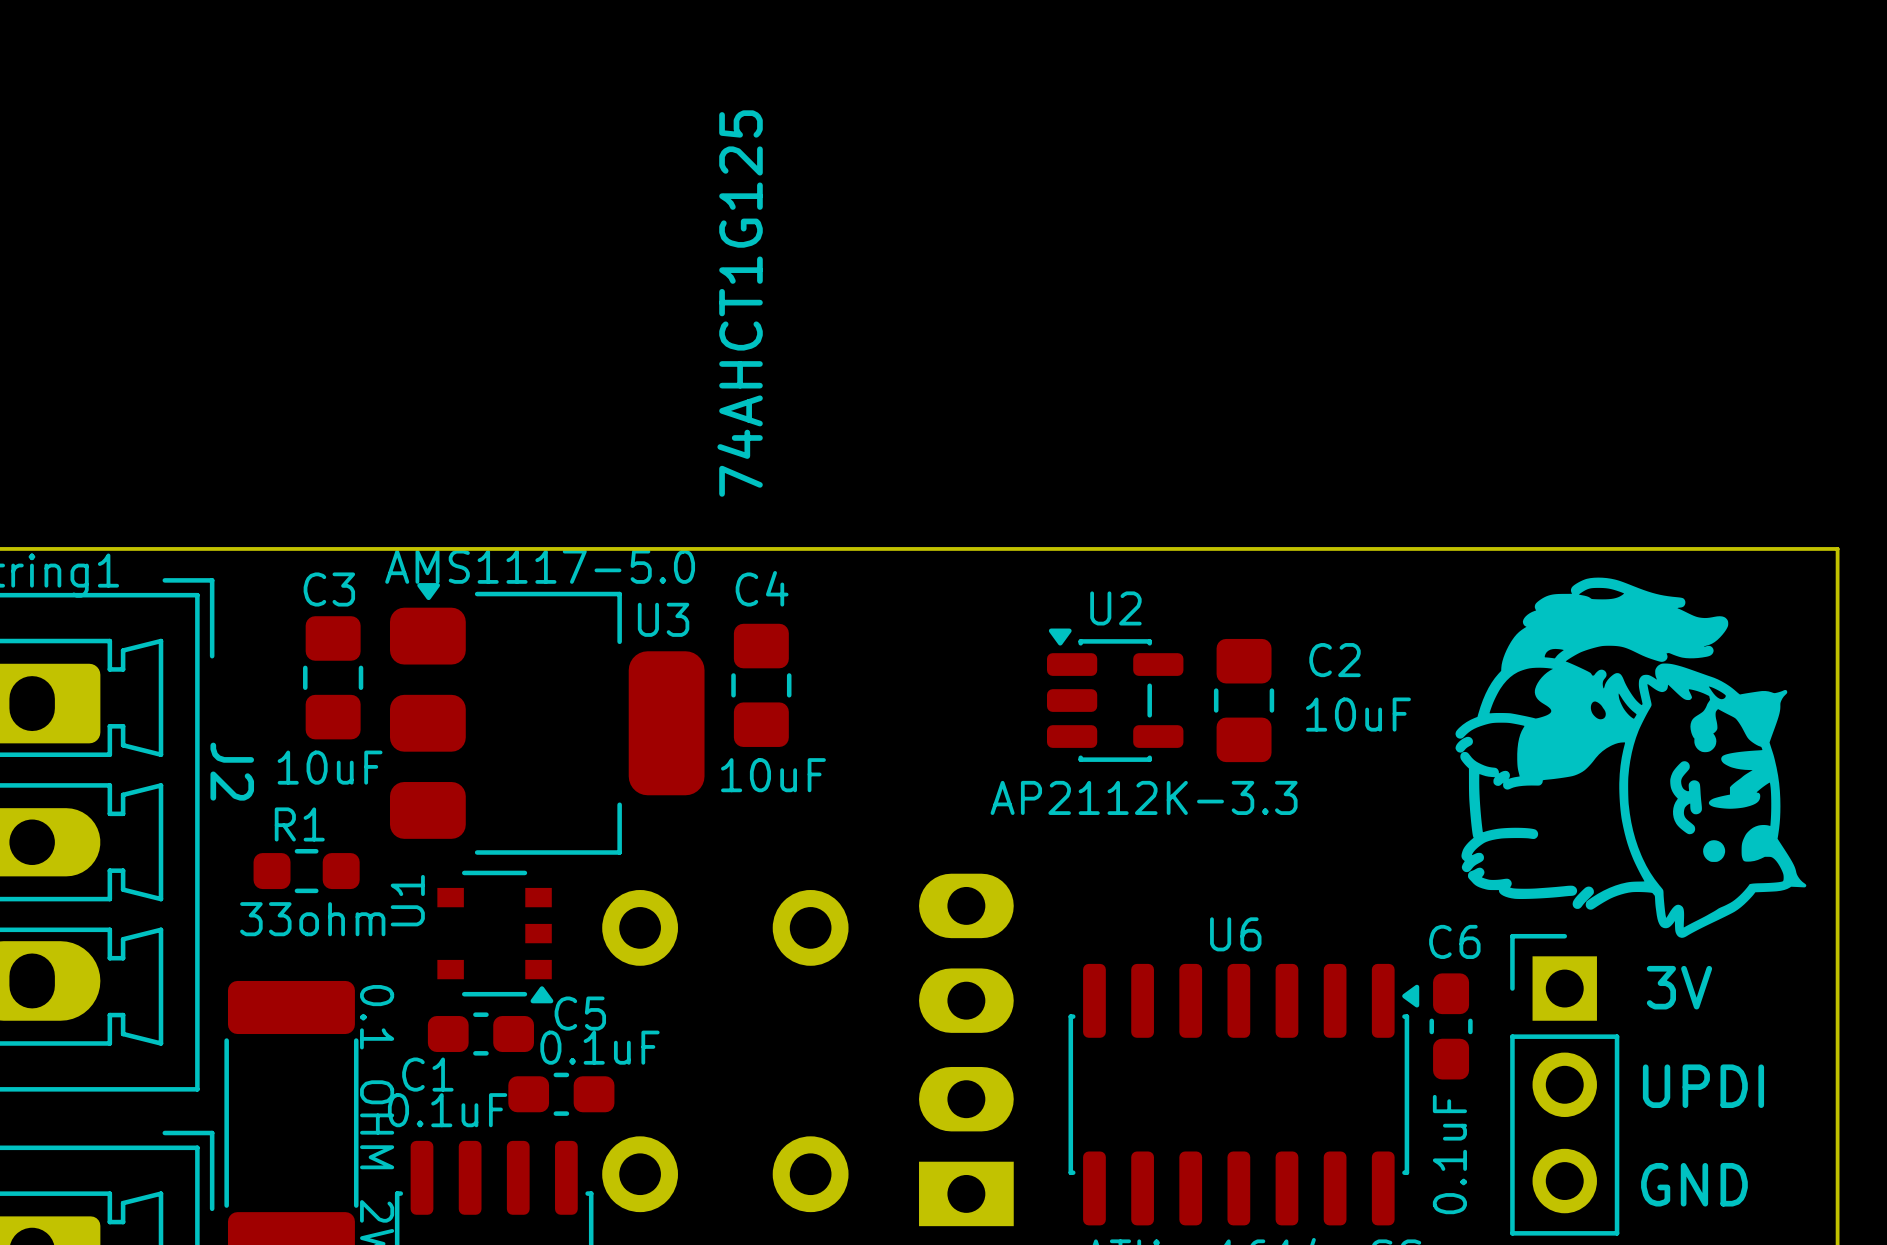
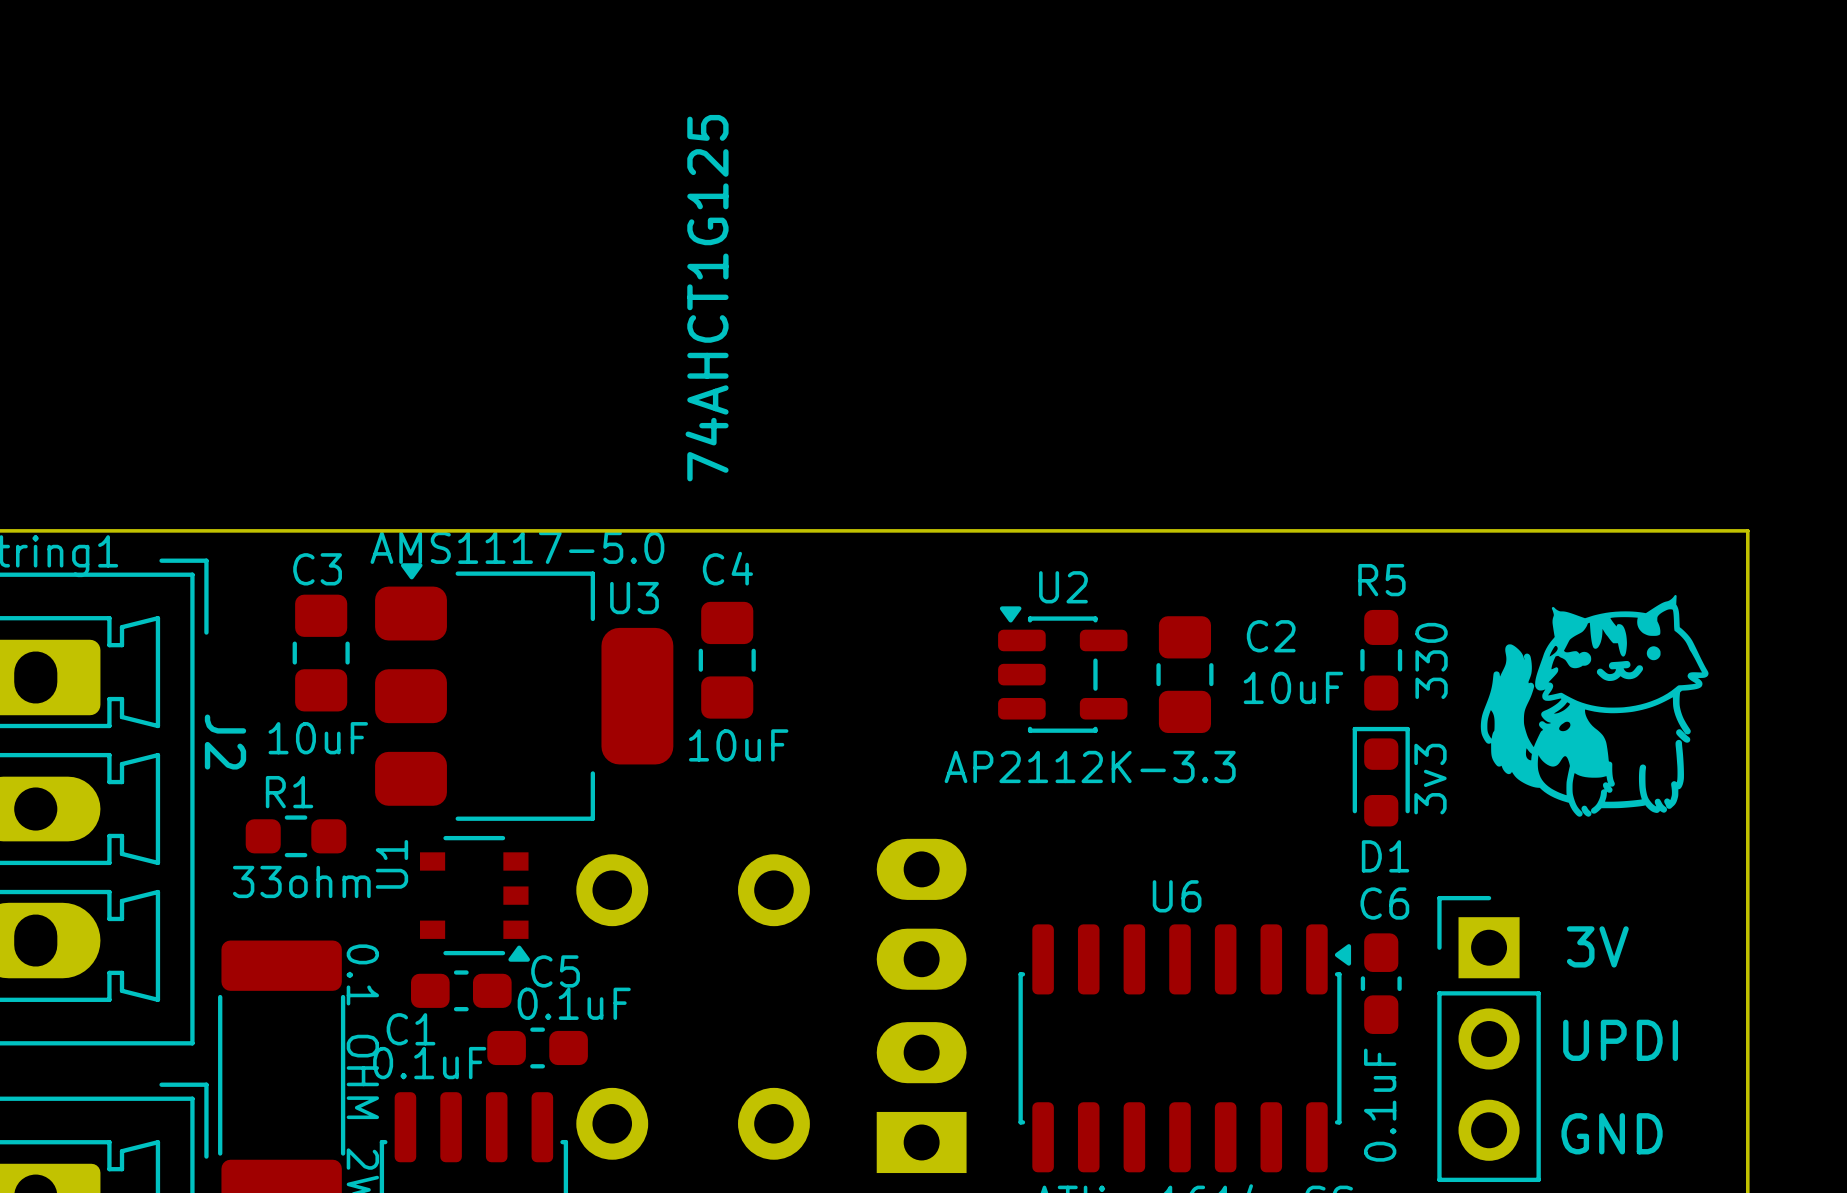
drawing: [1455, 577, 1807, 938] -> none
drawing: none -> [1480, 594, 1709, 817]
R5: none -> 330 (1381, 660)
D1: none -> 3v3 (1381, 776)

